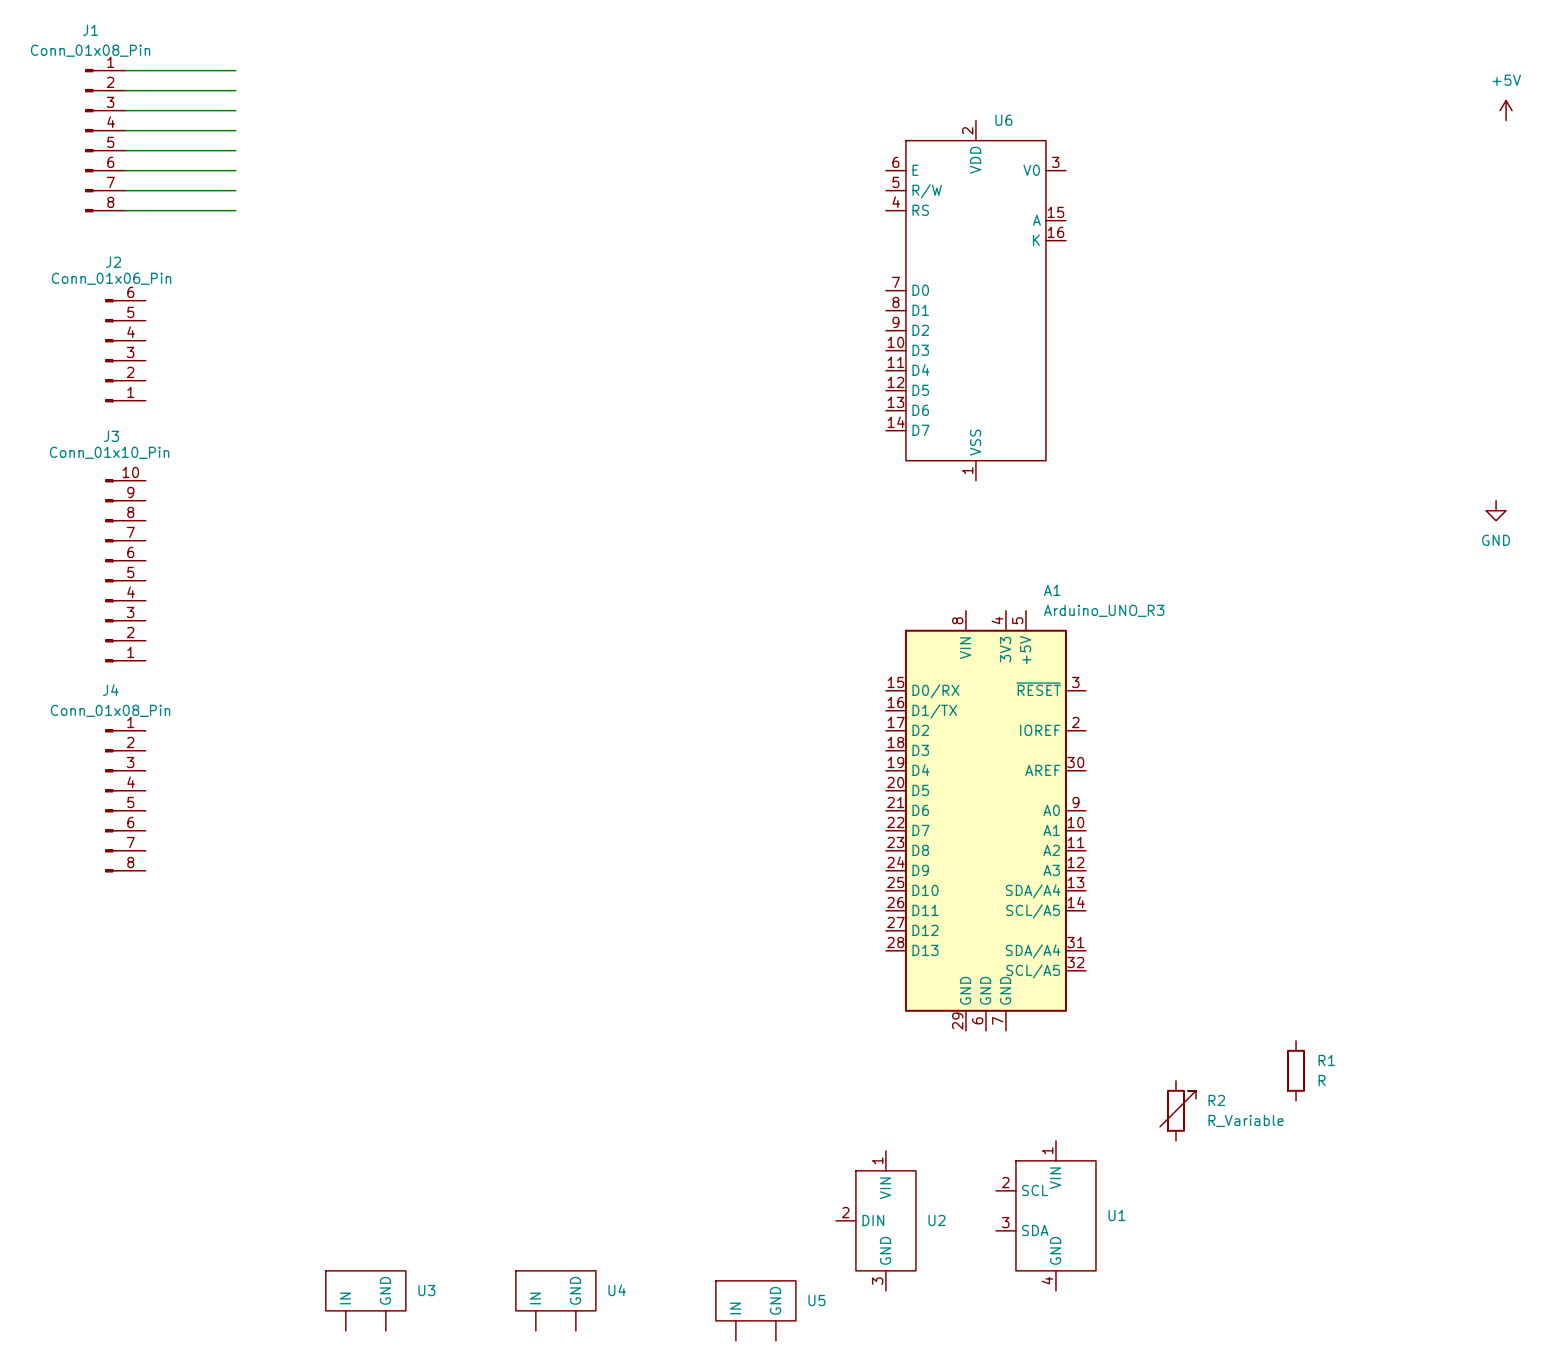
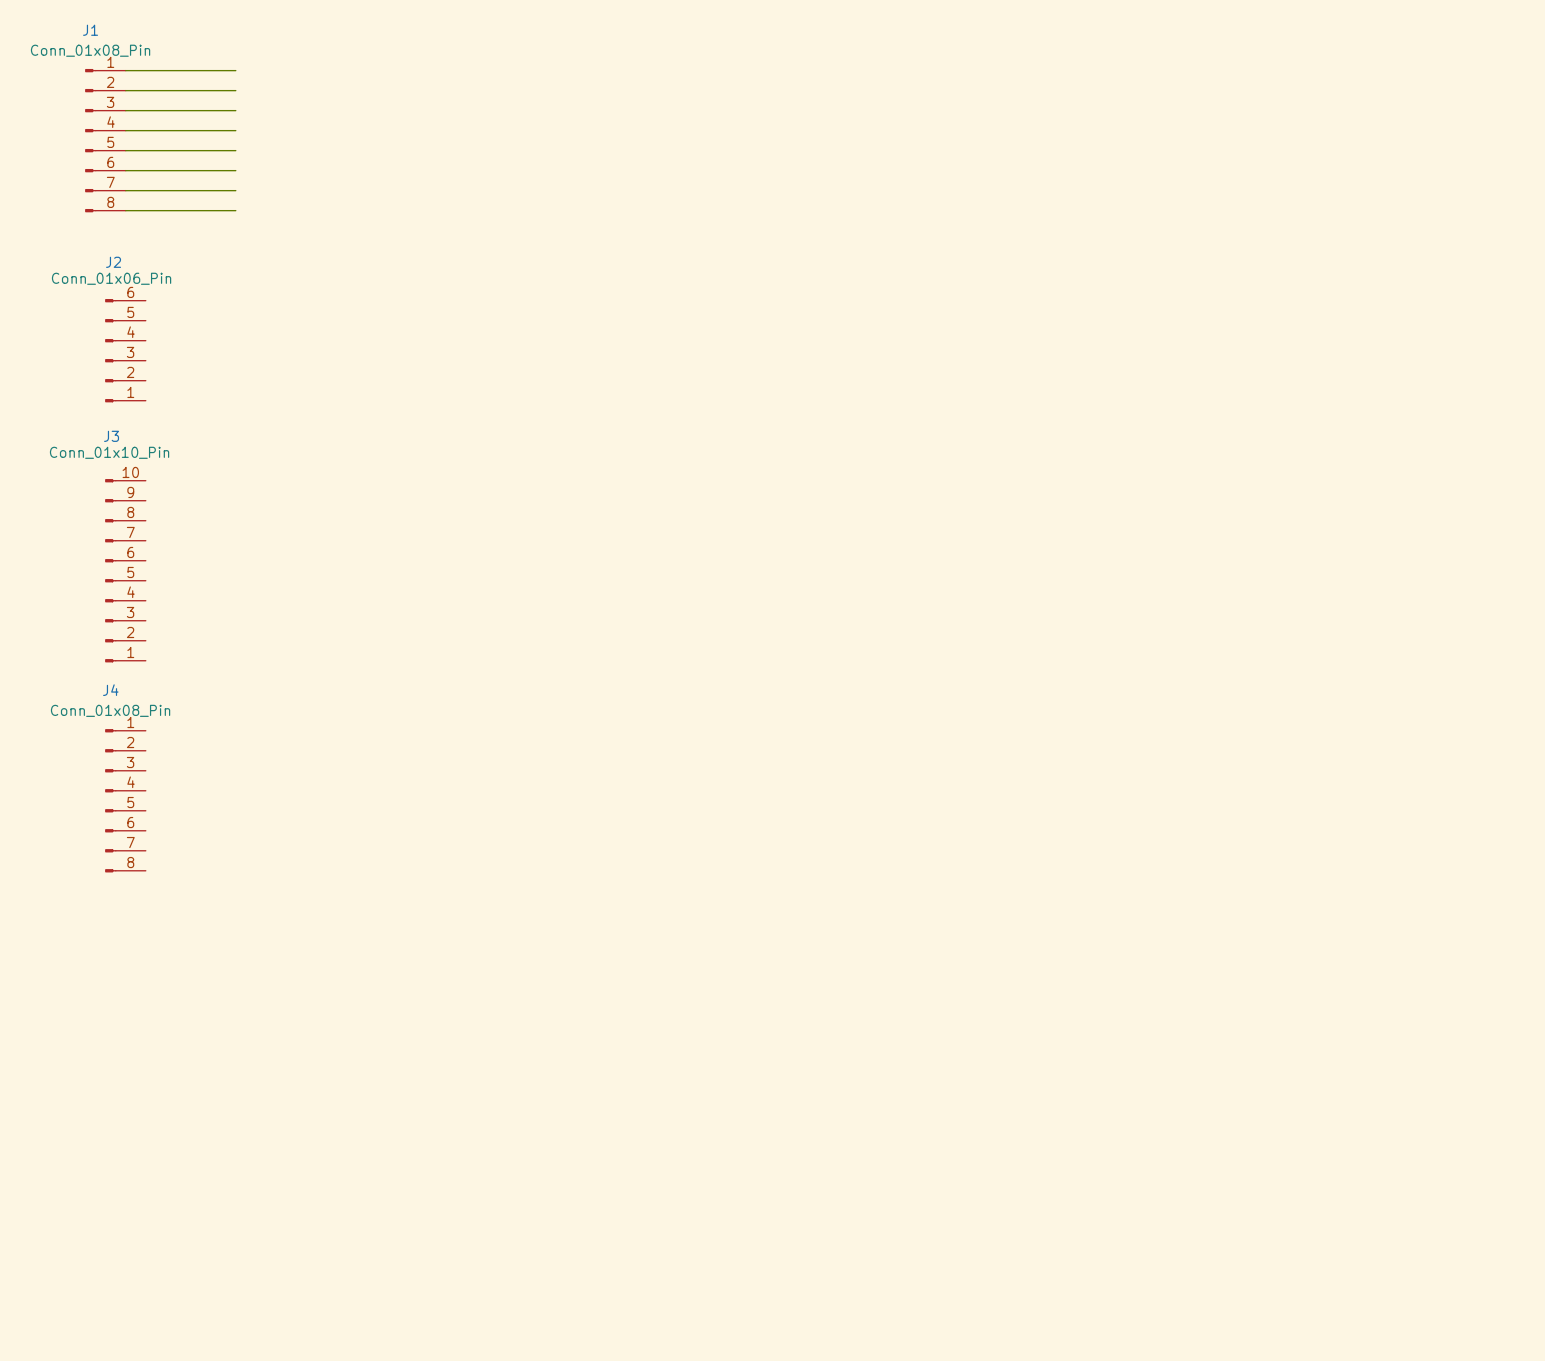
power symbol: +5V (1506, 110) -> none
U6: (975, 300) -> none
power symbol: GND (1496, 510) -> none
A1: Arduino_UNO_R3 (985, 820) -> none
R1: R (1296, 1070) -> none
R2: R_Variable (1177, 1110) -> none
U1: (1045, 1215) -> none
U2: (875, 1220) -> none
U3: (365, 1300) -> none
U4: (555, 1300) -> none
U5: (755, 1310) -> none

